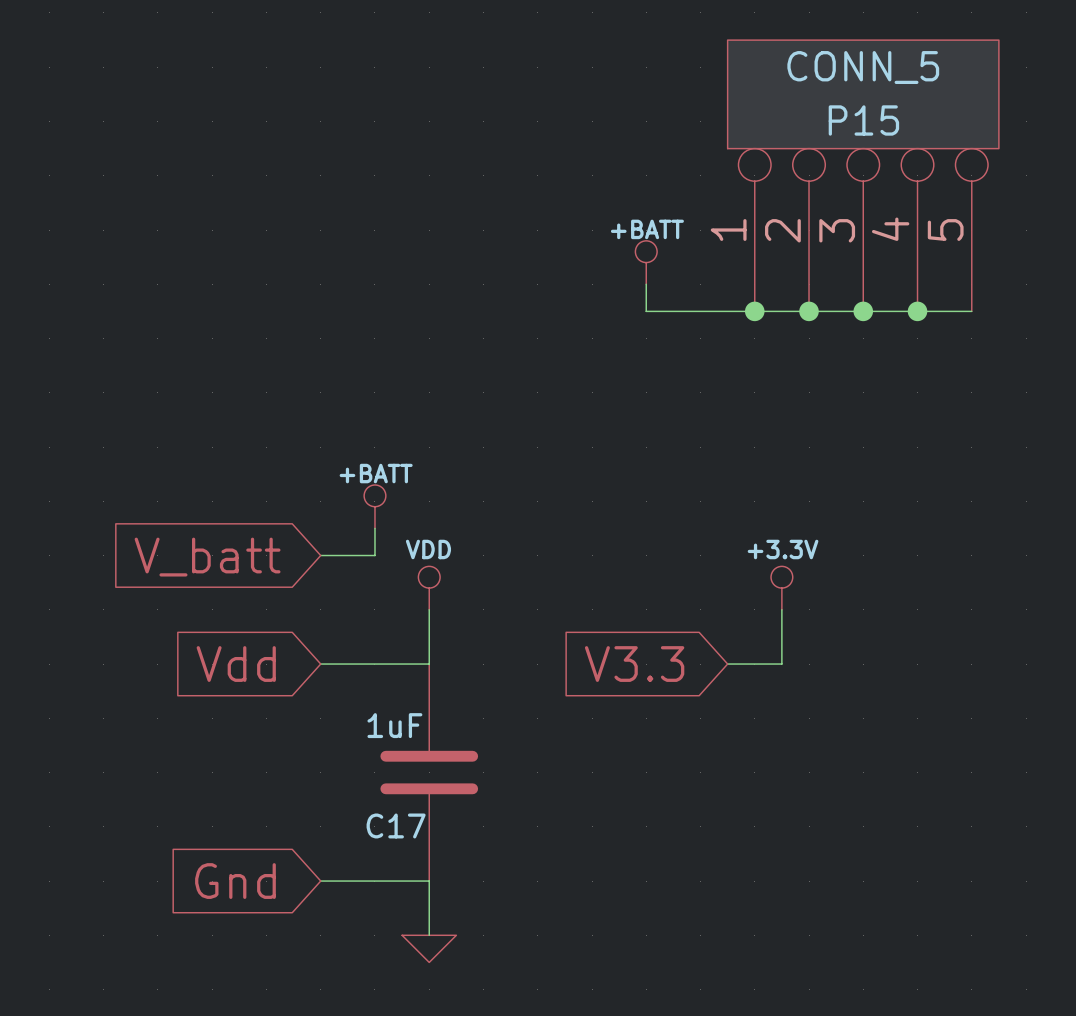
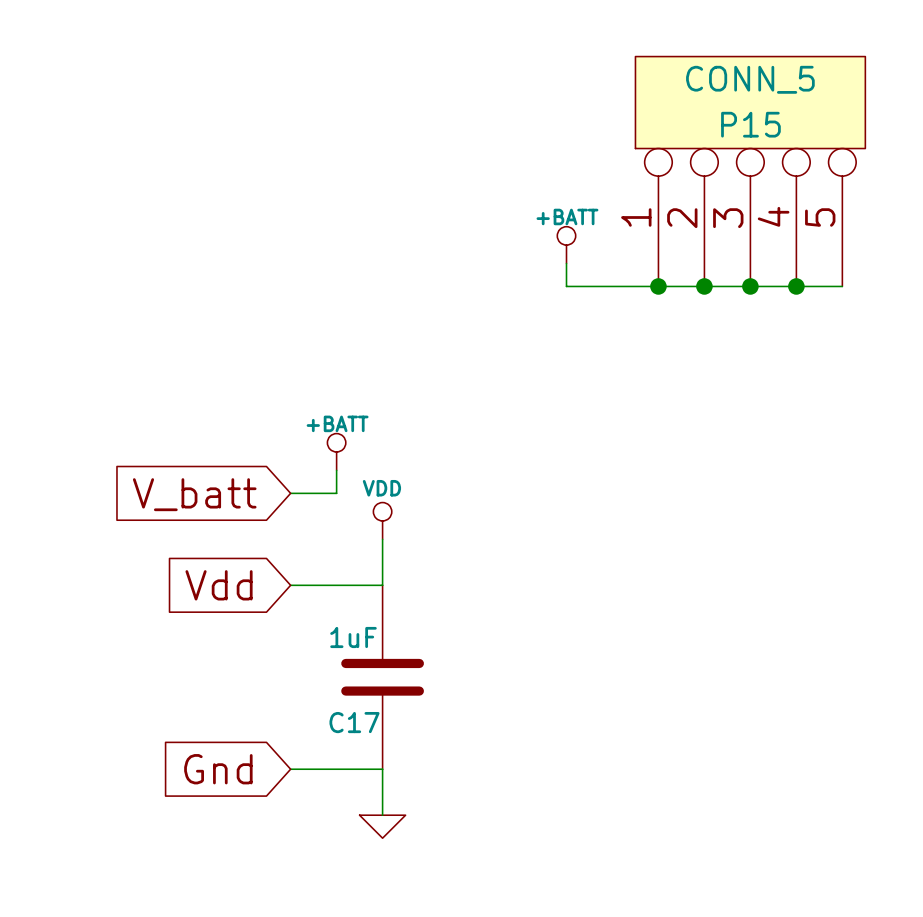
power symbol: +3.3V (781, 588) -> none
wire: (781, 609) (781, 664) (727, 664) -> none
global label: V3.3 (634, 664) -> none

